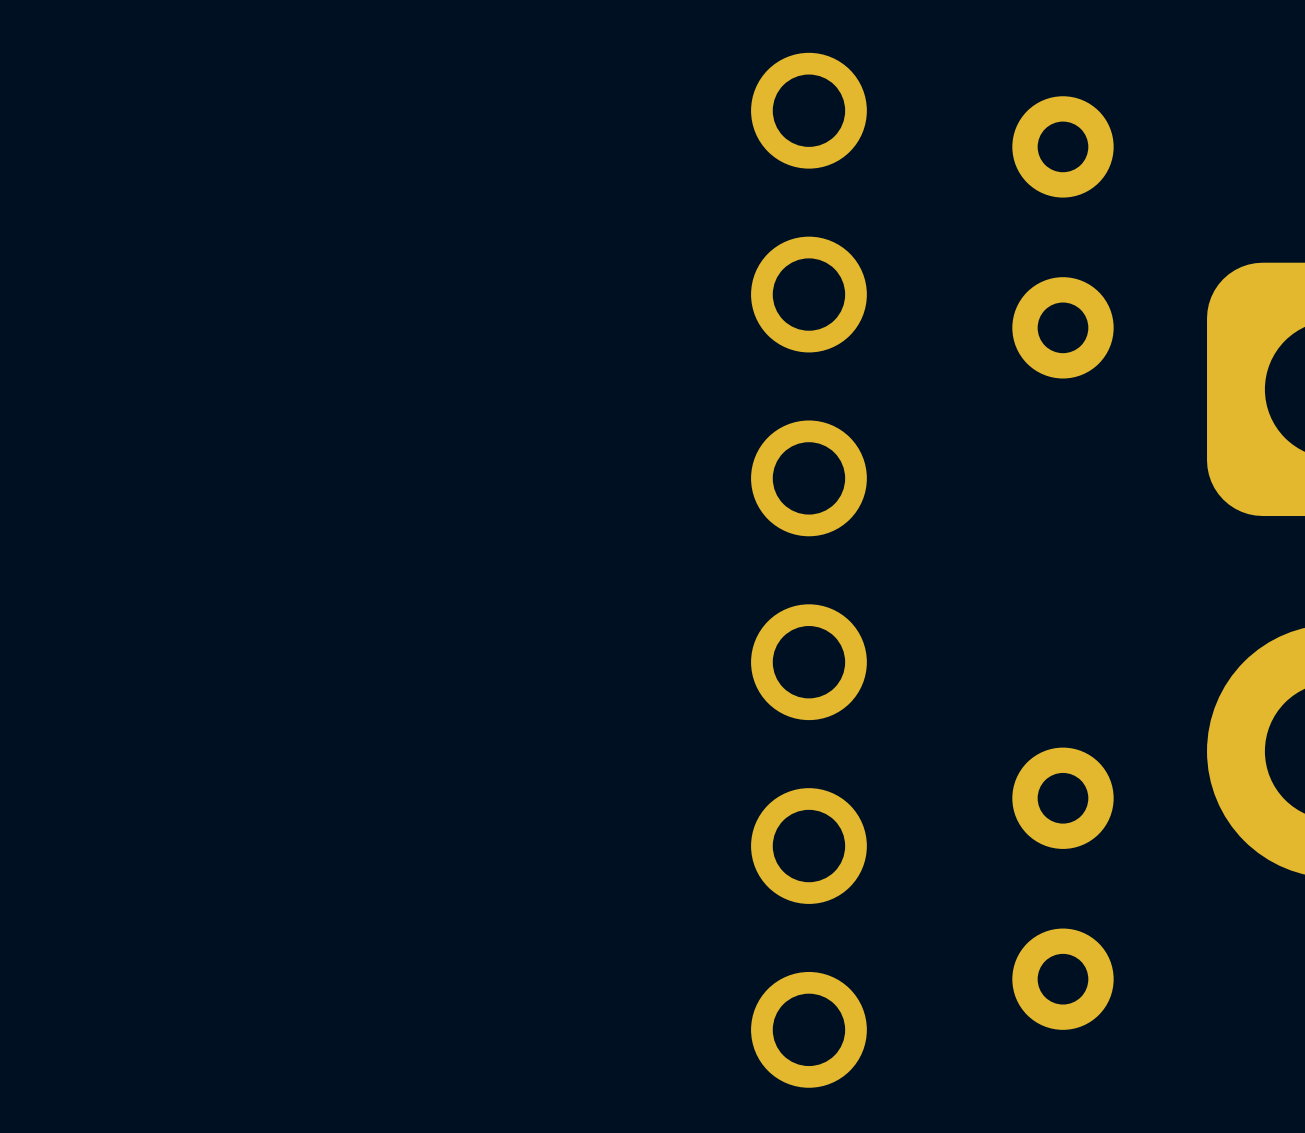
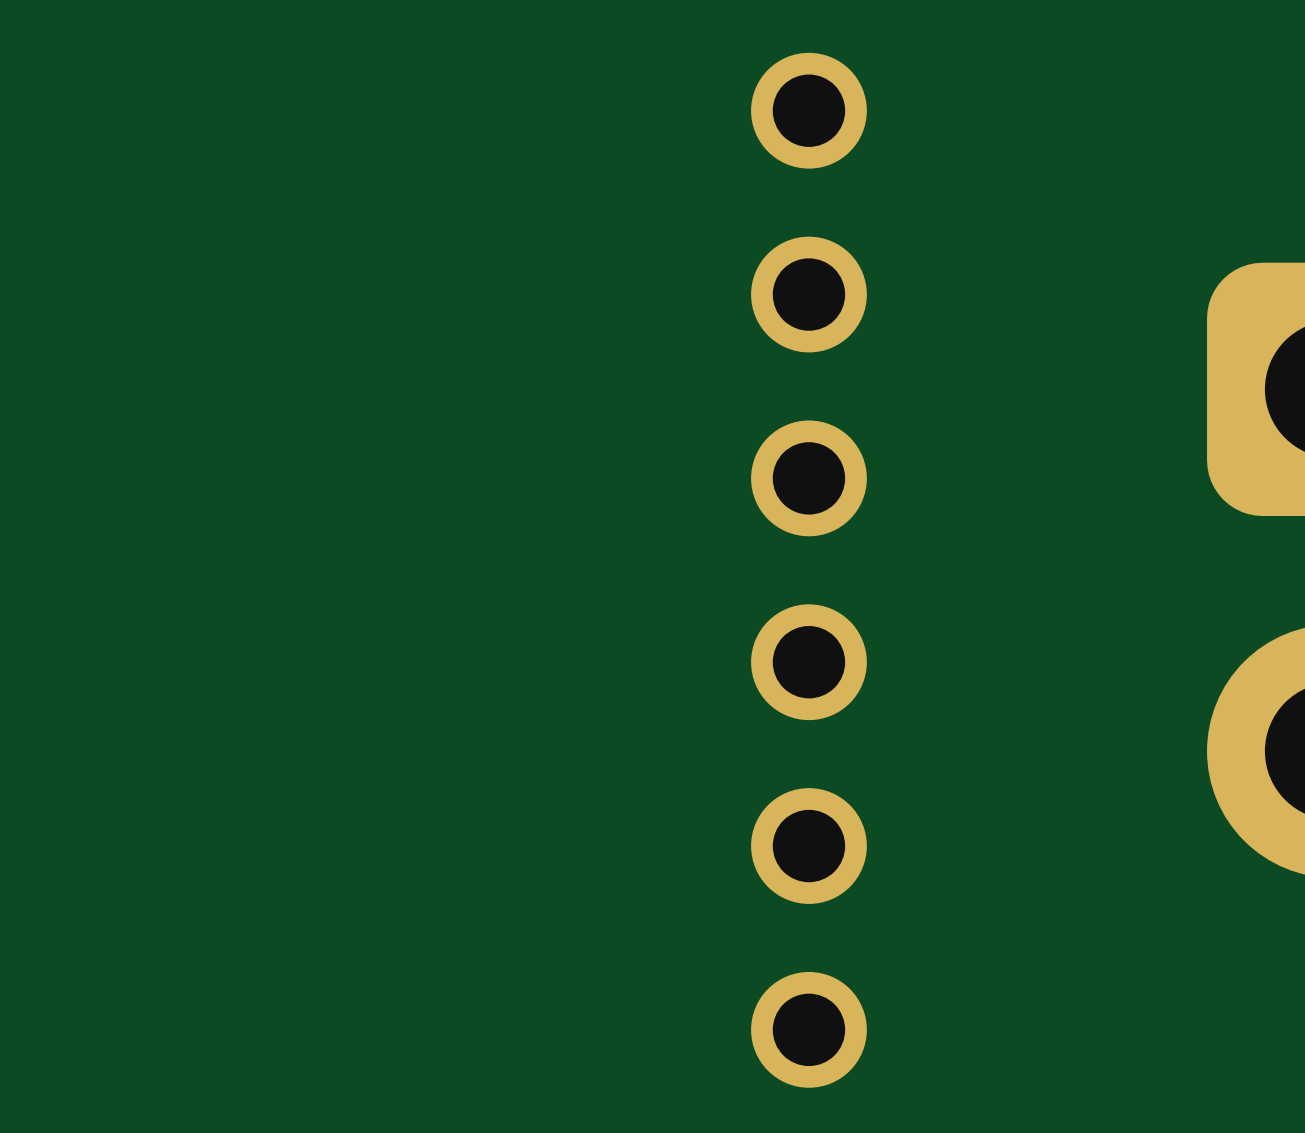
part: (1062, 237) -> none
part: (1062, 888) -> none

